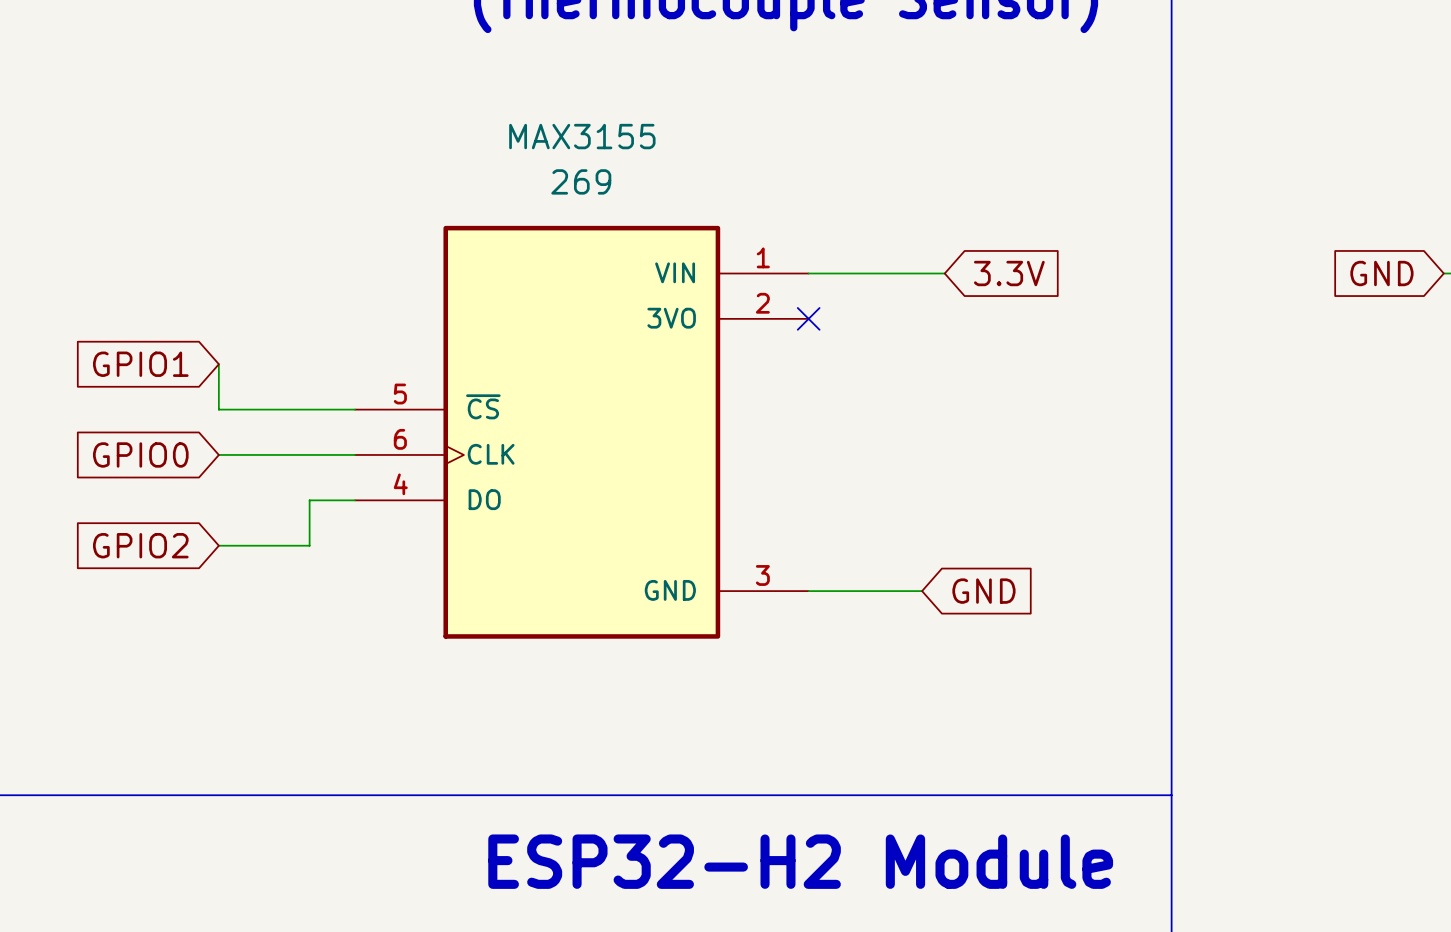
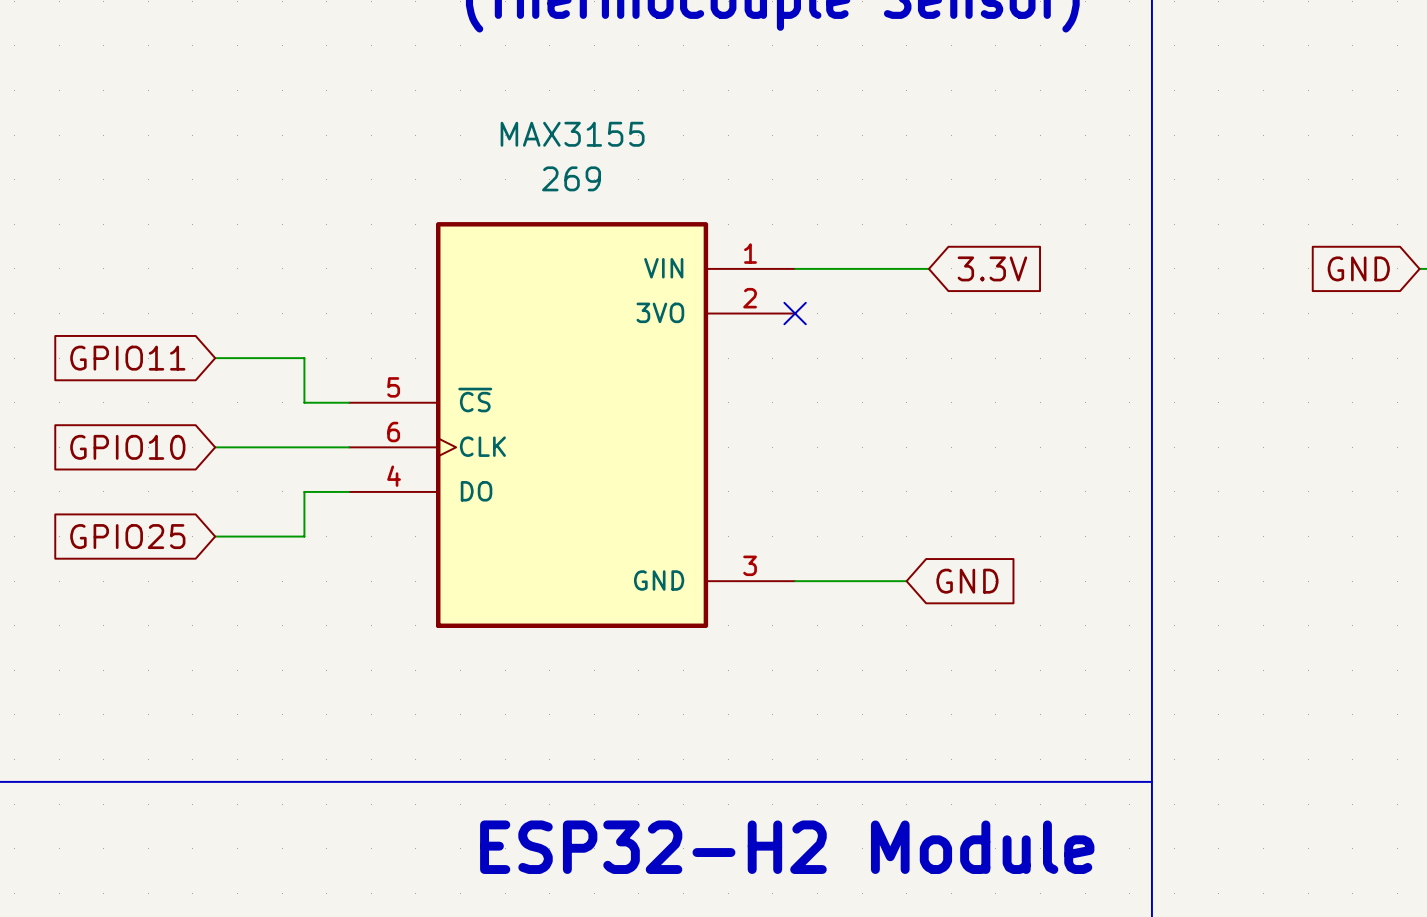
global label: GPIO1 (140, 364) -> GPIO11 (127, 358)
wire: (218, 364) (218, 409) (309, 409) -> (215, 358) (304, 358) (304, 402)
global label: GPIO0 (140, 454) -> GPIO10 (127, 447)
global label: GPIO2 (140, 545) -> GPIO25 (127, 536)

